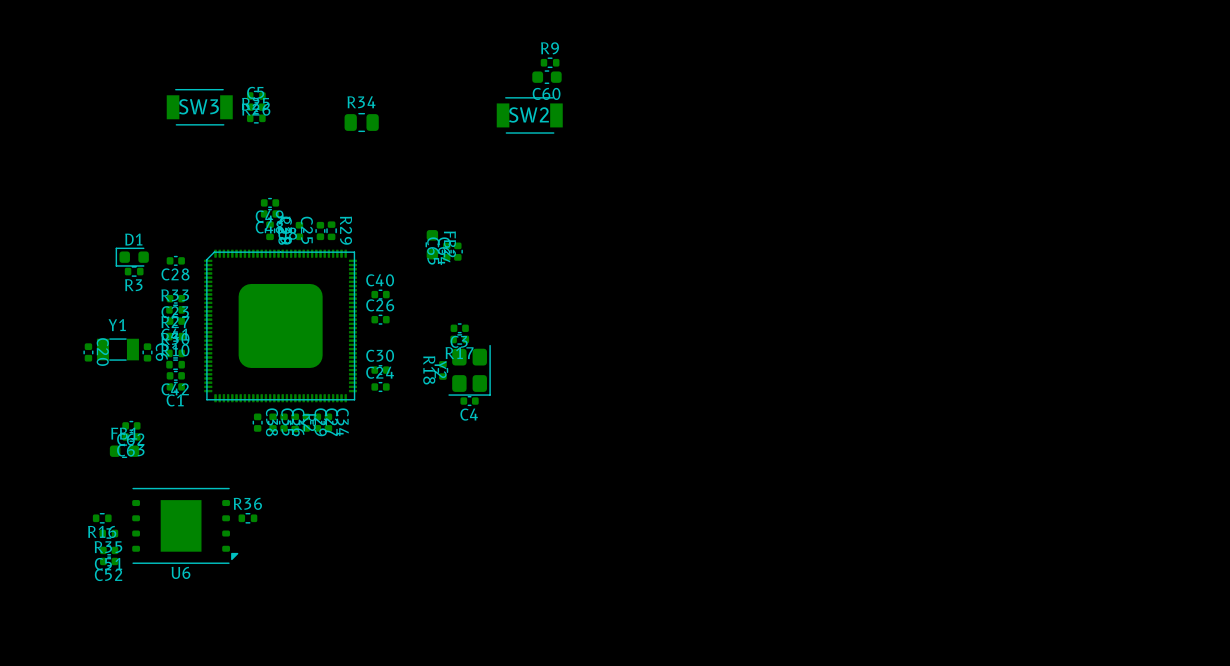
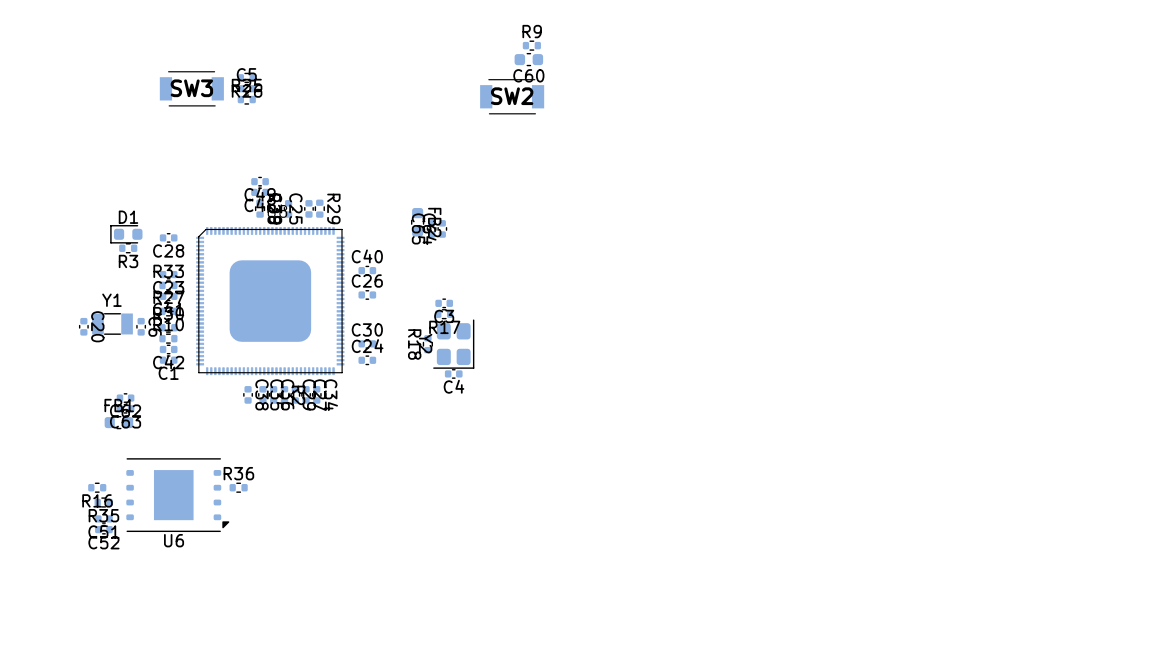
R34: (361, 122) -> none

